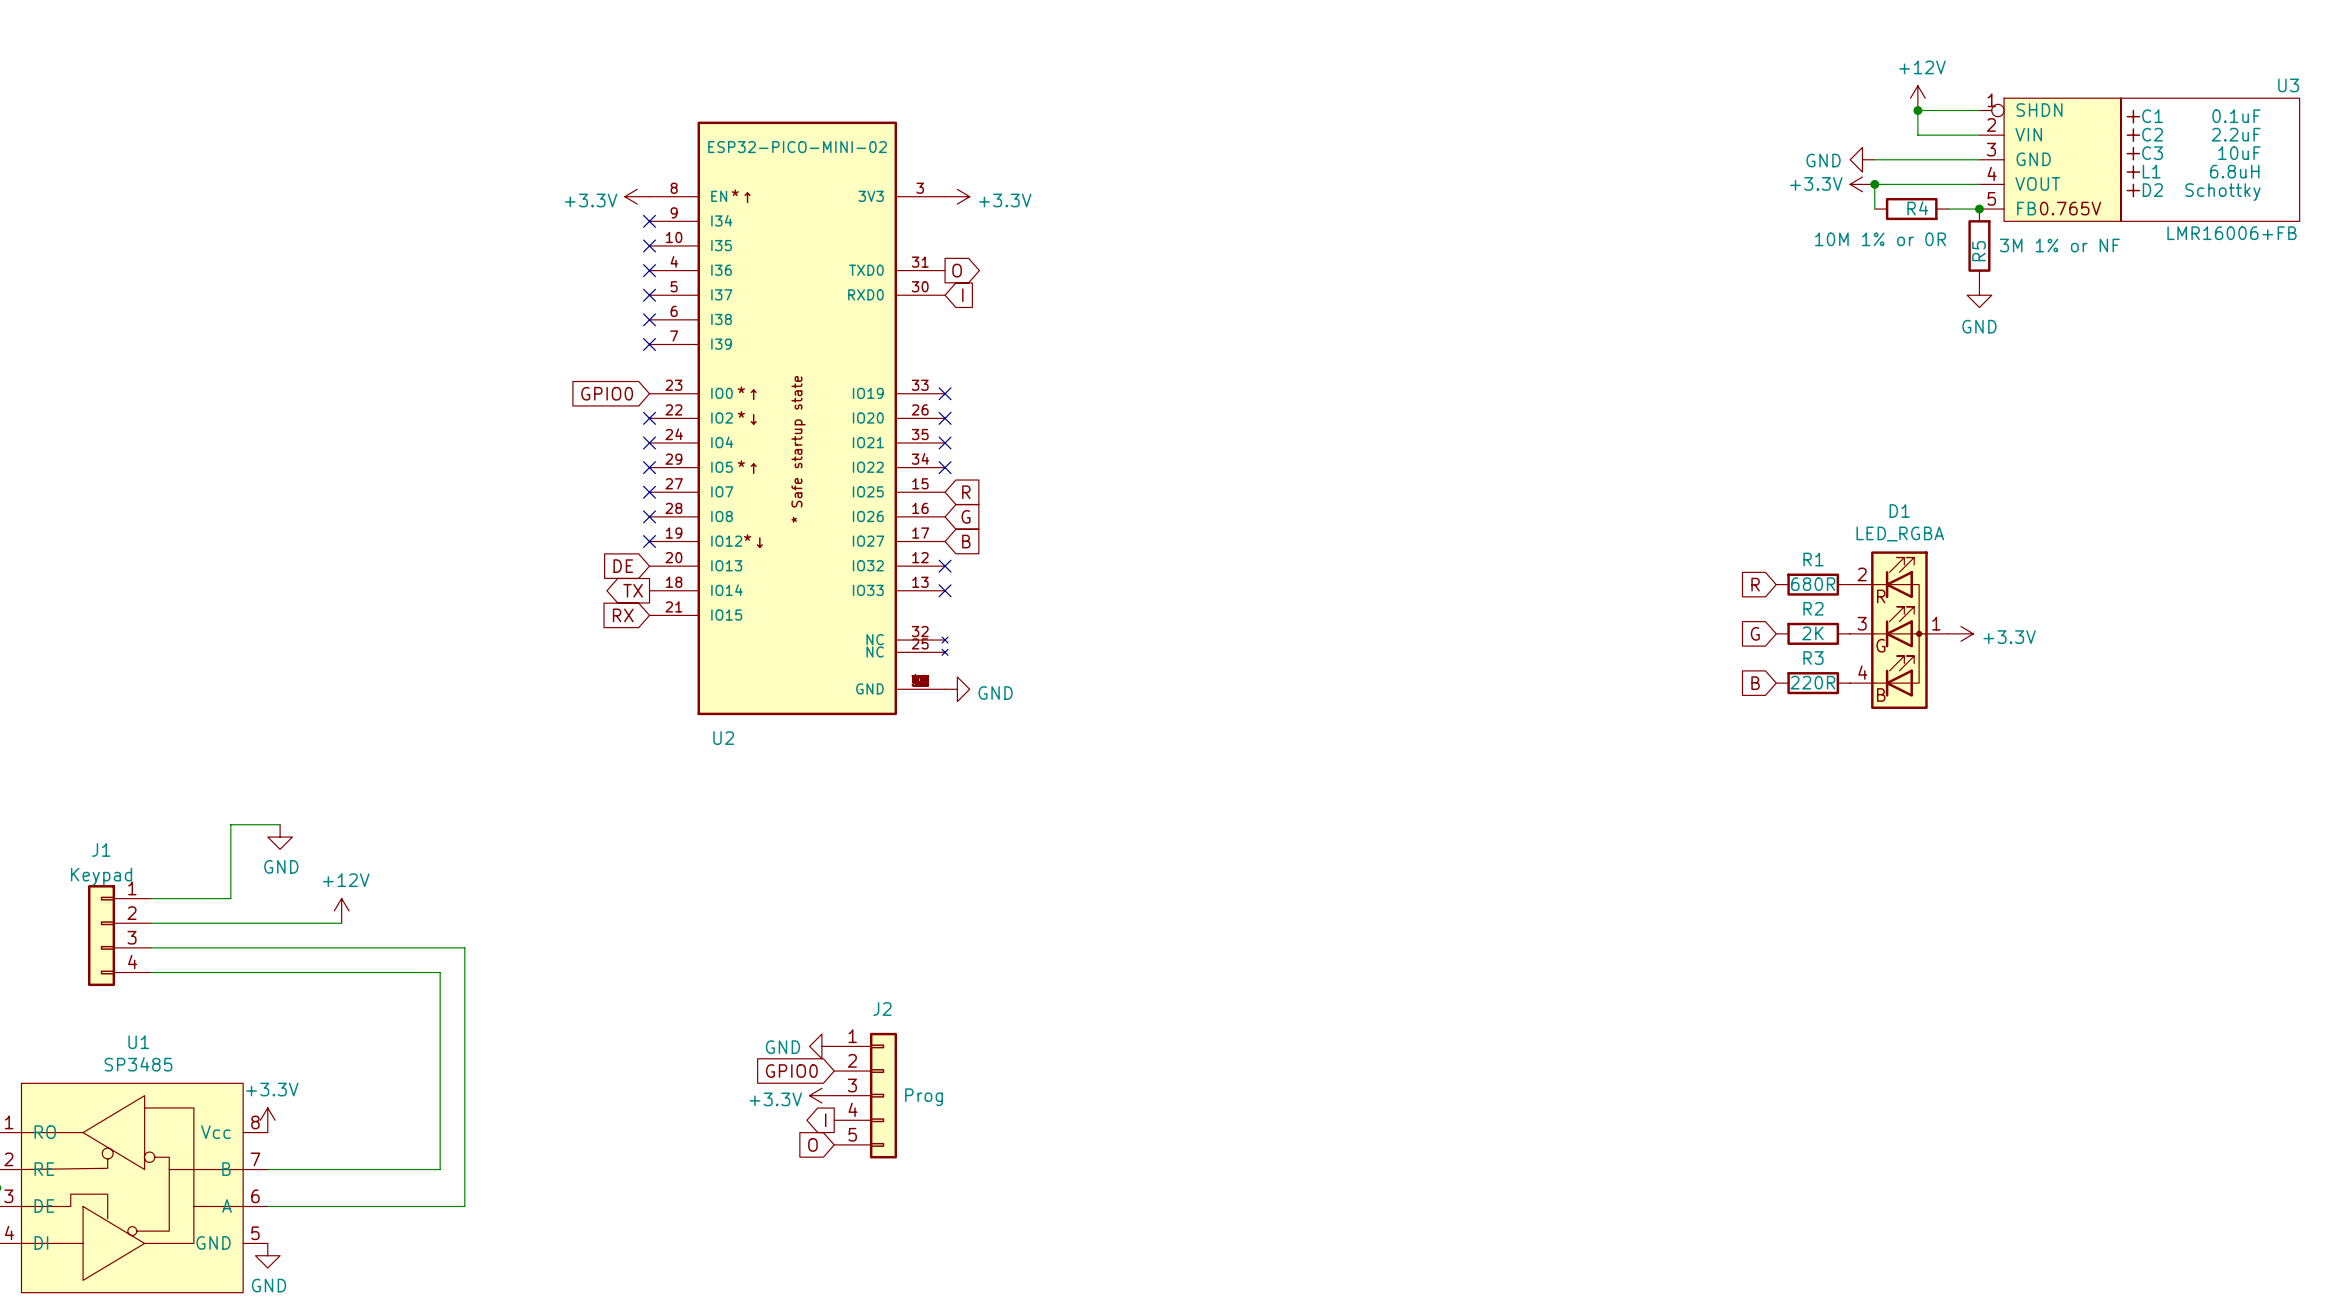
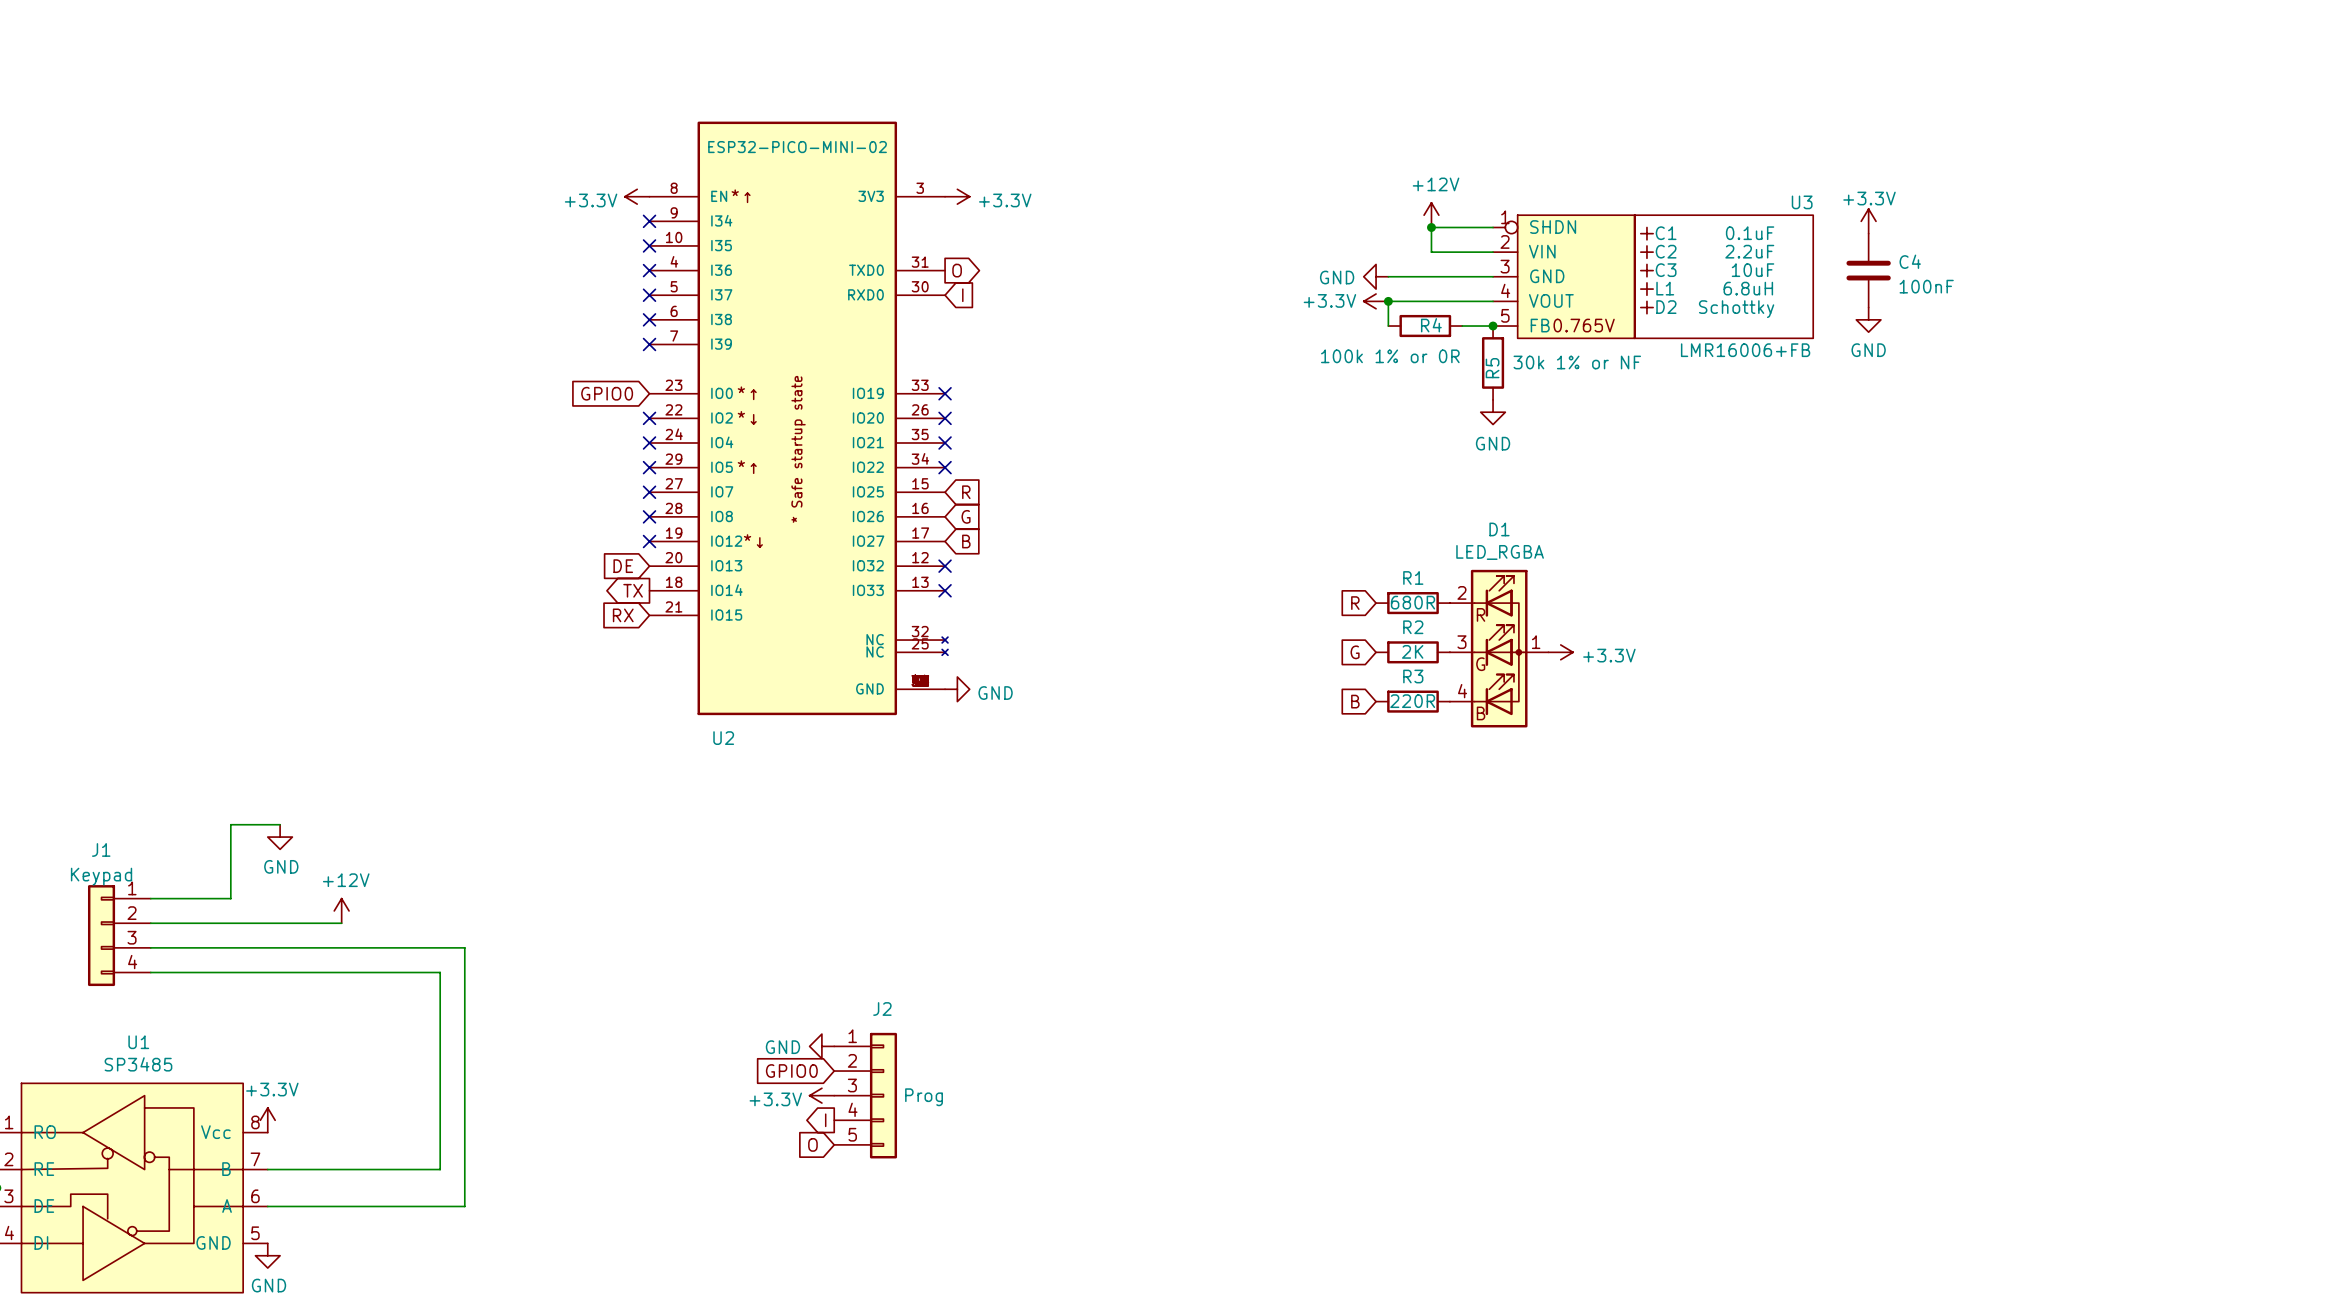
power symbol: +12V (1917, 98) -> none
junction: (1917, 110) -> none
wire: (1979, 110) (1917, 110) (1917, 135) (1979, 135) -> none
C1 position: (2133, 116) -> (1646, 233)
C2 position: (2133, 135) -> (1646, 252)
C3 position: (2133, 153) -> (1646, 270)
power symbol: GND (1862, 159) -> none
wire: (1874, 159) (1979, 159) -> none
U3 position: (2139, 159) -> (1653, 276)
L1 position: (2133, 172) -> (1646, 289)
power symbol text position: +3.3V (1816, 183) -> +3.3V (1869, 198)
power symbol rotation: 0° (1862, 184) -> 90° clockwise (1868, 221)
power symbol position: +3.3V (1862, 184) -> +3.3V (1868, 221)
junction: (1874, 184) -> none
wire: (1979, 184) (1874, 184) (1874, 209) -> none
D2 position: (2133, 190) -> (1646, 307)
R4 position: (1911, 209) -> (1425, 326)
wire: (1948, 209) (1979, 209) -> none
junction: (1979, 209) -> none
power symbol: none -> +12V (1431, 215)
junction: none -> (1431, 227)
wire: none -> (1493, 227) (1431, 227) (1431, 252) (1493, 252)
R4 value: 10M 1% or 0R (1880, 239) -> 100k 1% or 0R (1390, 356)
R5 position: (1979, 245) -> (1493, 362)
R5 value: 3M 1% or NF (2059, 245) -> 30k 1% or NF (1577, 362)
C4: none -> 100nF (1868, 270)
power symbol: none -> GND (1376, 276)
wire: none -> (1388, 276) (1493, 276)
power symbol: GND (1979, 295) -> none
power symbol: none -> +3.3V (1376, 301)
junction: none -> (1388, 301)
wire: none -> (1493, 301) (1388, 301) (1388, 326)
power symbol: none -> GND (1868, 319)
wire: none -> (1462, 326) (1493, 326)
junction: none -> (1493, 326)
power symbol: none -> GND (1493, 412)
global label: R (1755, 584) -> none
R1 position: (1813, 584) -> (1413, 603)
global label: none -> R (1355, 603)
D1 position: (1899, 630) -> (1499, 648)
global label: G (1755, 633) -> none
R2 position: (1813, 633) -> (1413, 652)
power symbol: +3.3V (1960, 633) -> none
global label: none -> G (1355, 652)
power symbol: none -> +3.3V (1560, 652)
global label: B (1755, 683) -> none
R3 position: (1813, 683) -> (1413, 701)
global label: none -> B (1355, 701)

